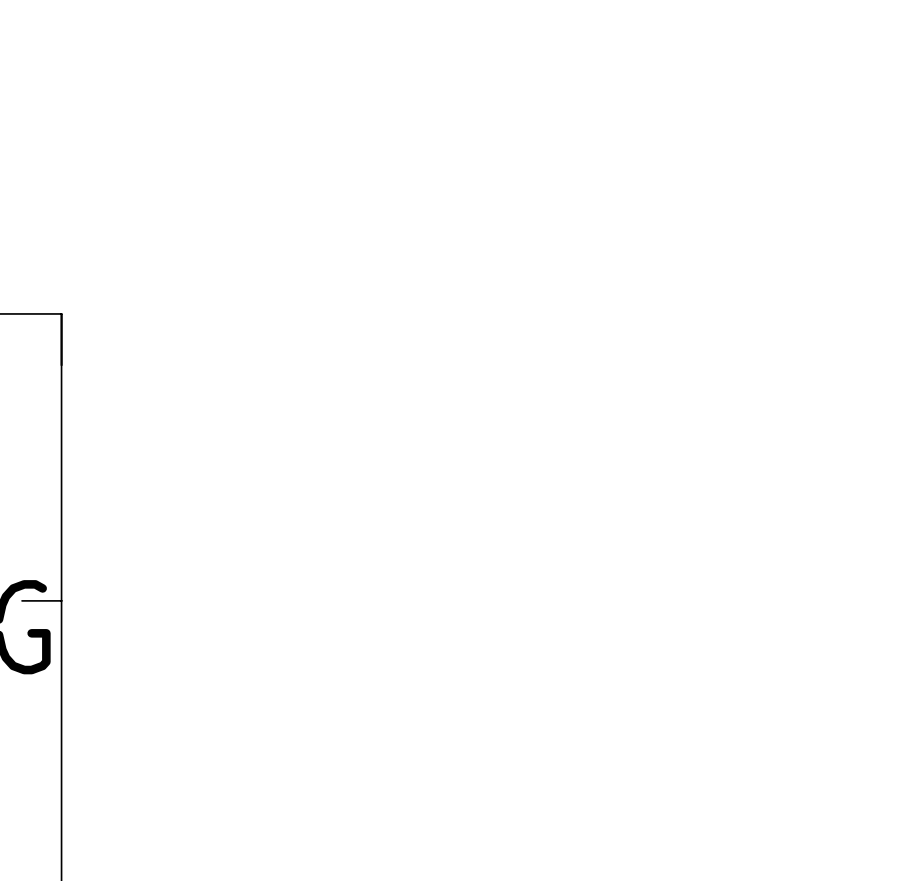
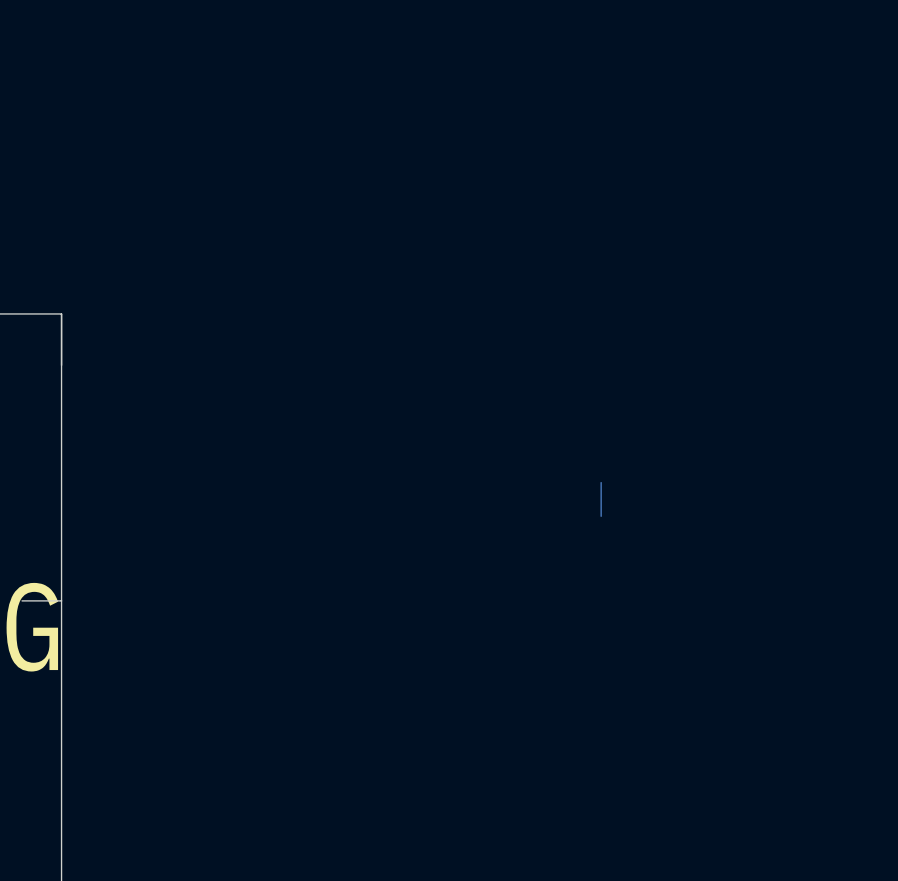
bottom track: none -> (601, 482) (601, 516)

